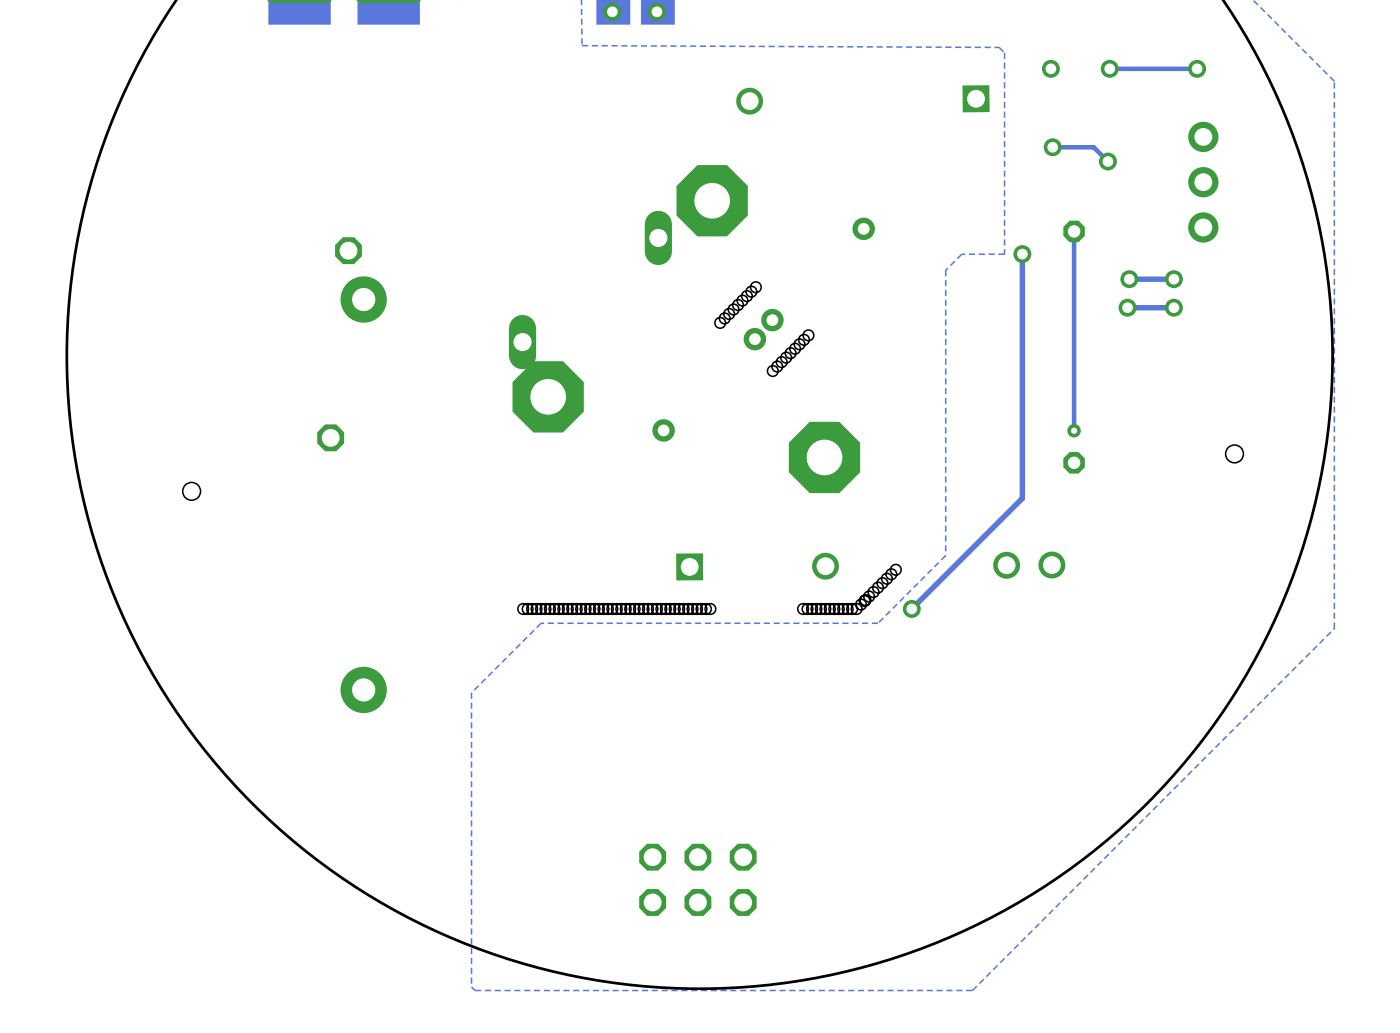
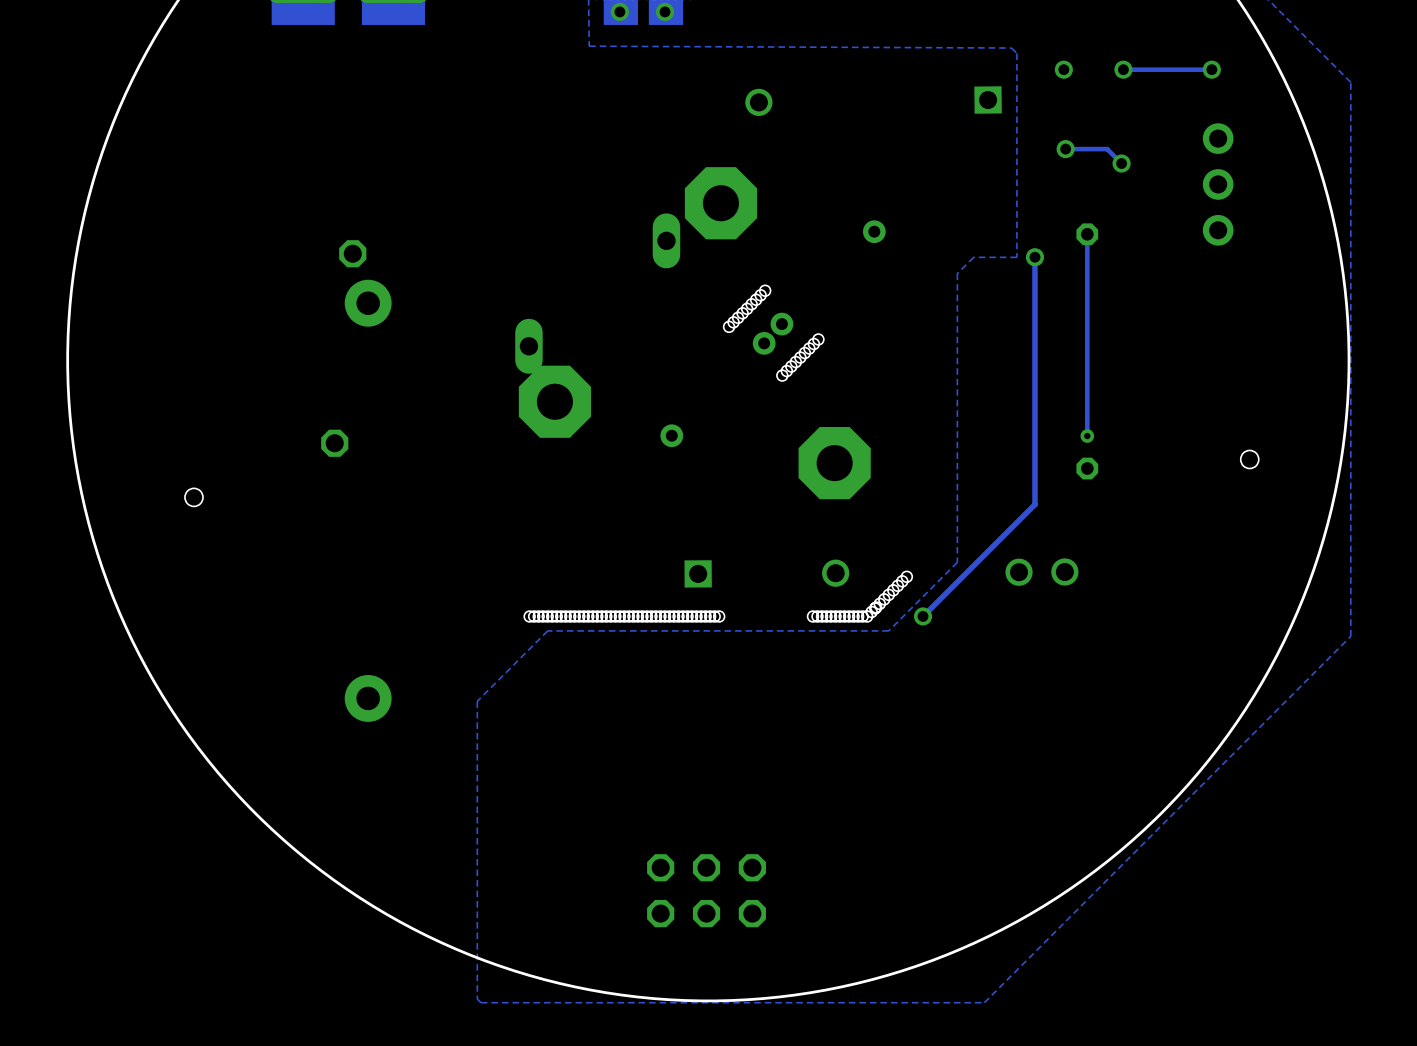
via: (1129, 279) -> none
track: (1173, 279) (1129, 279) -> none
via: (1173, 279) -> none
via: (1127, 307) -> none
track: (1173, 307) (1127, 307) -> none
via: (1173, 307) -> none

